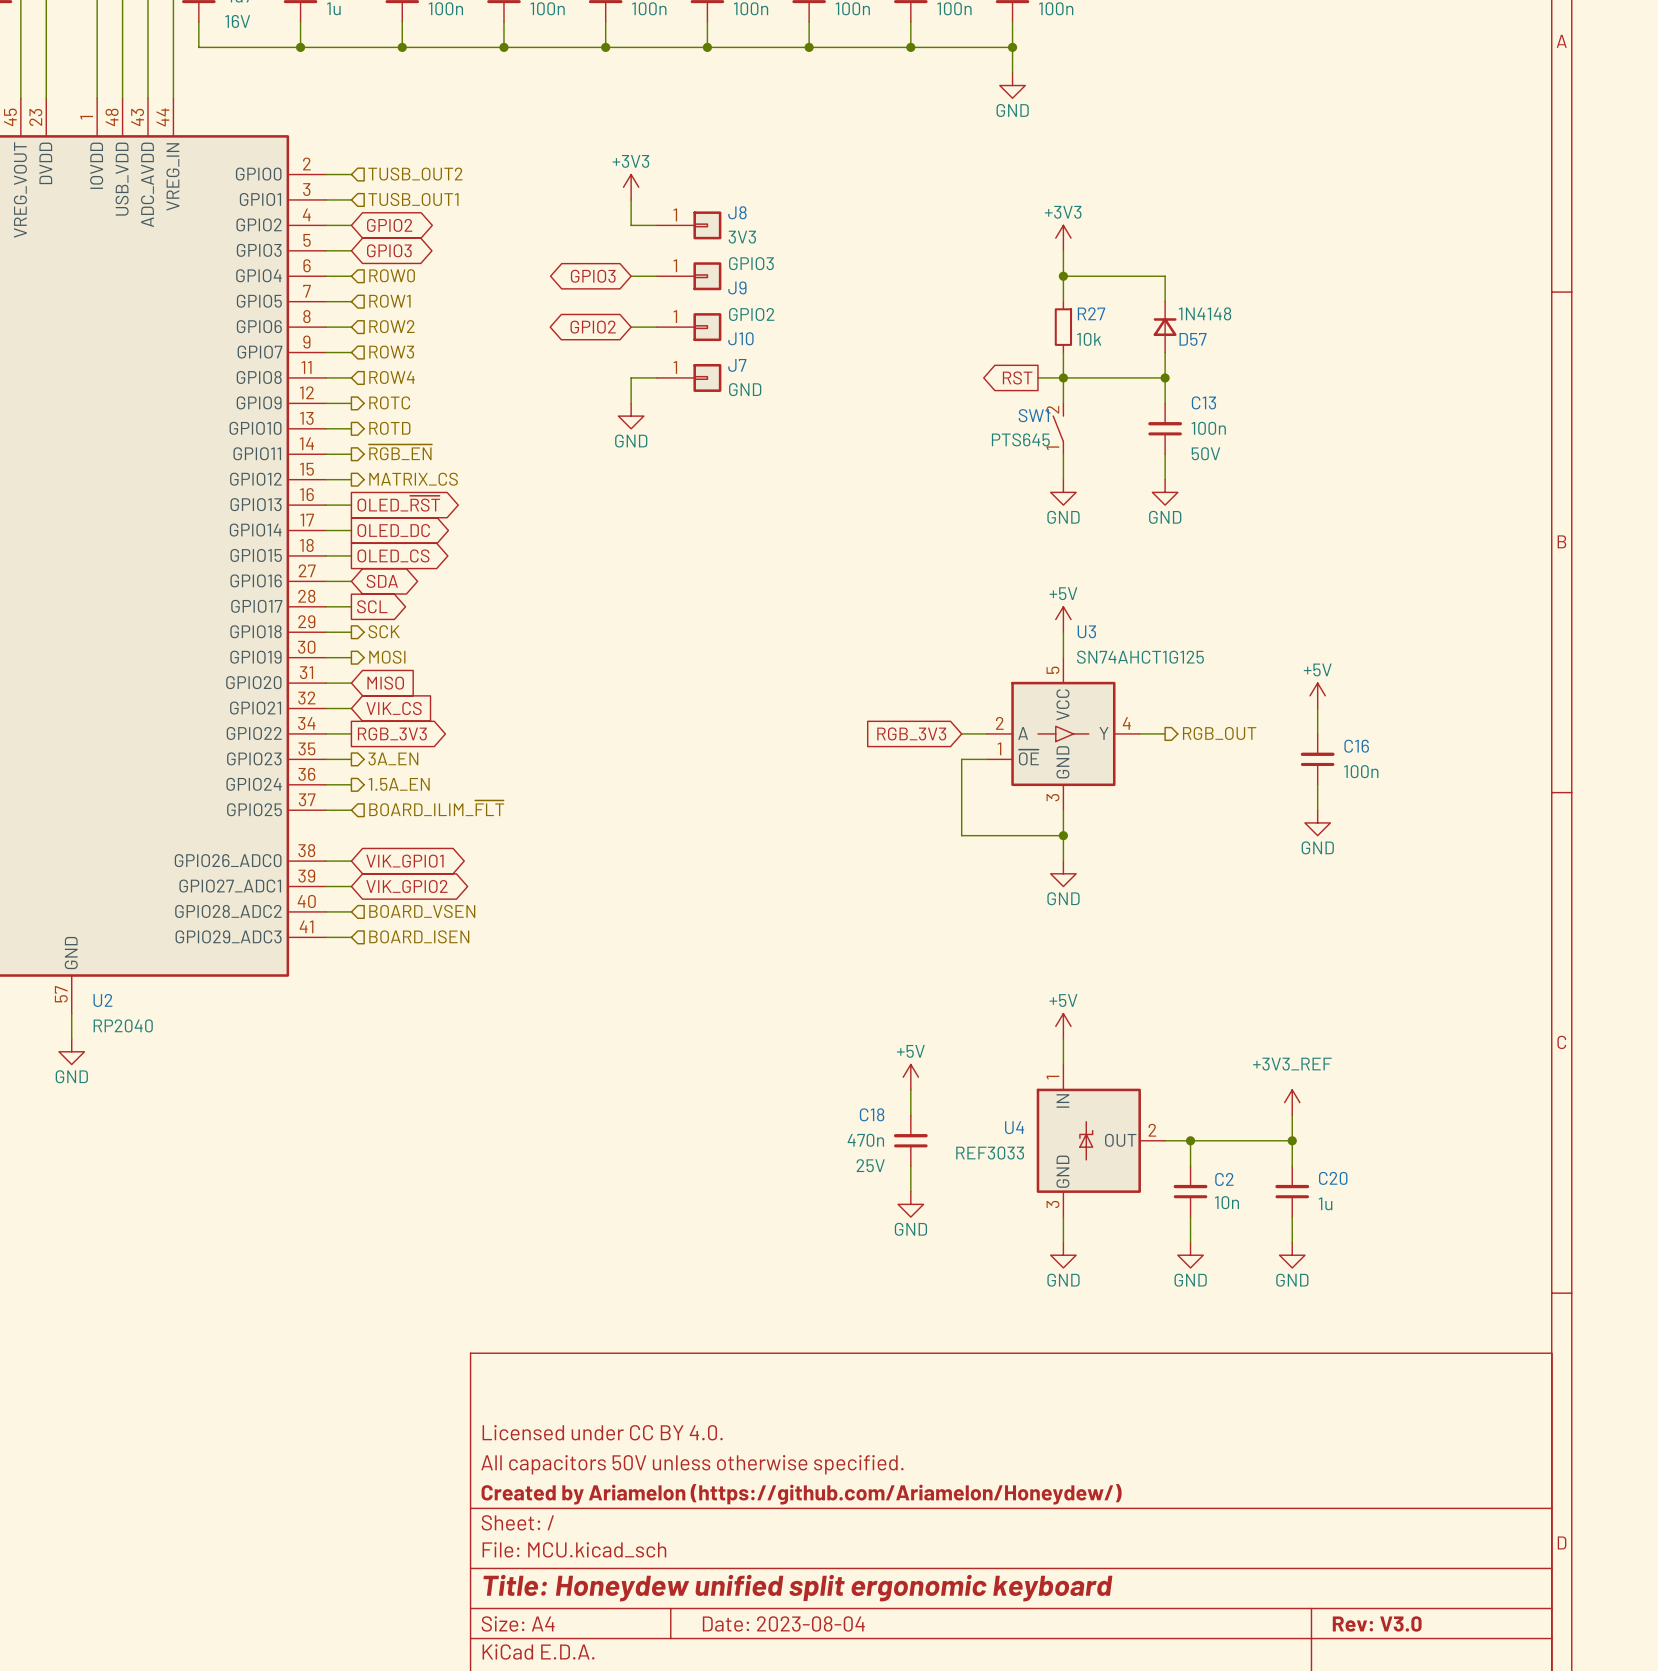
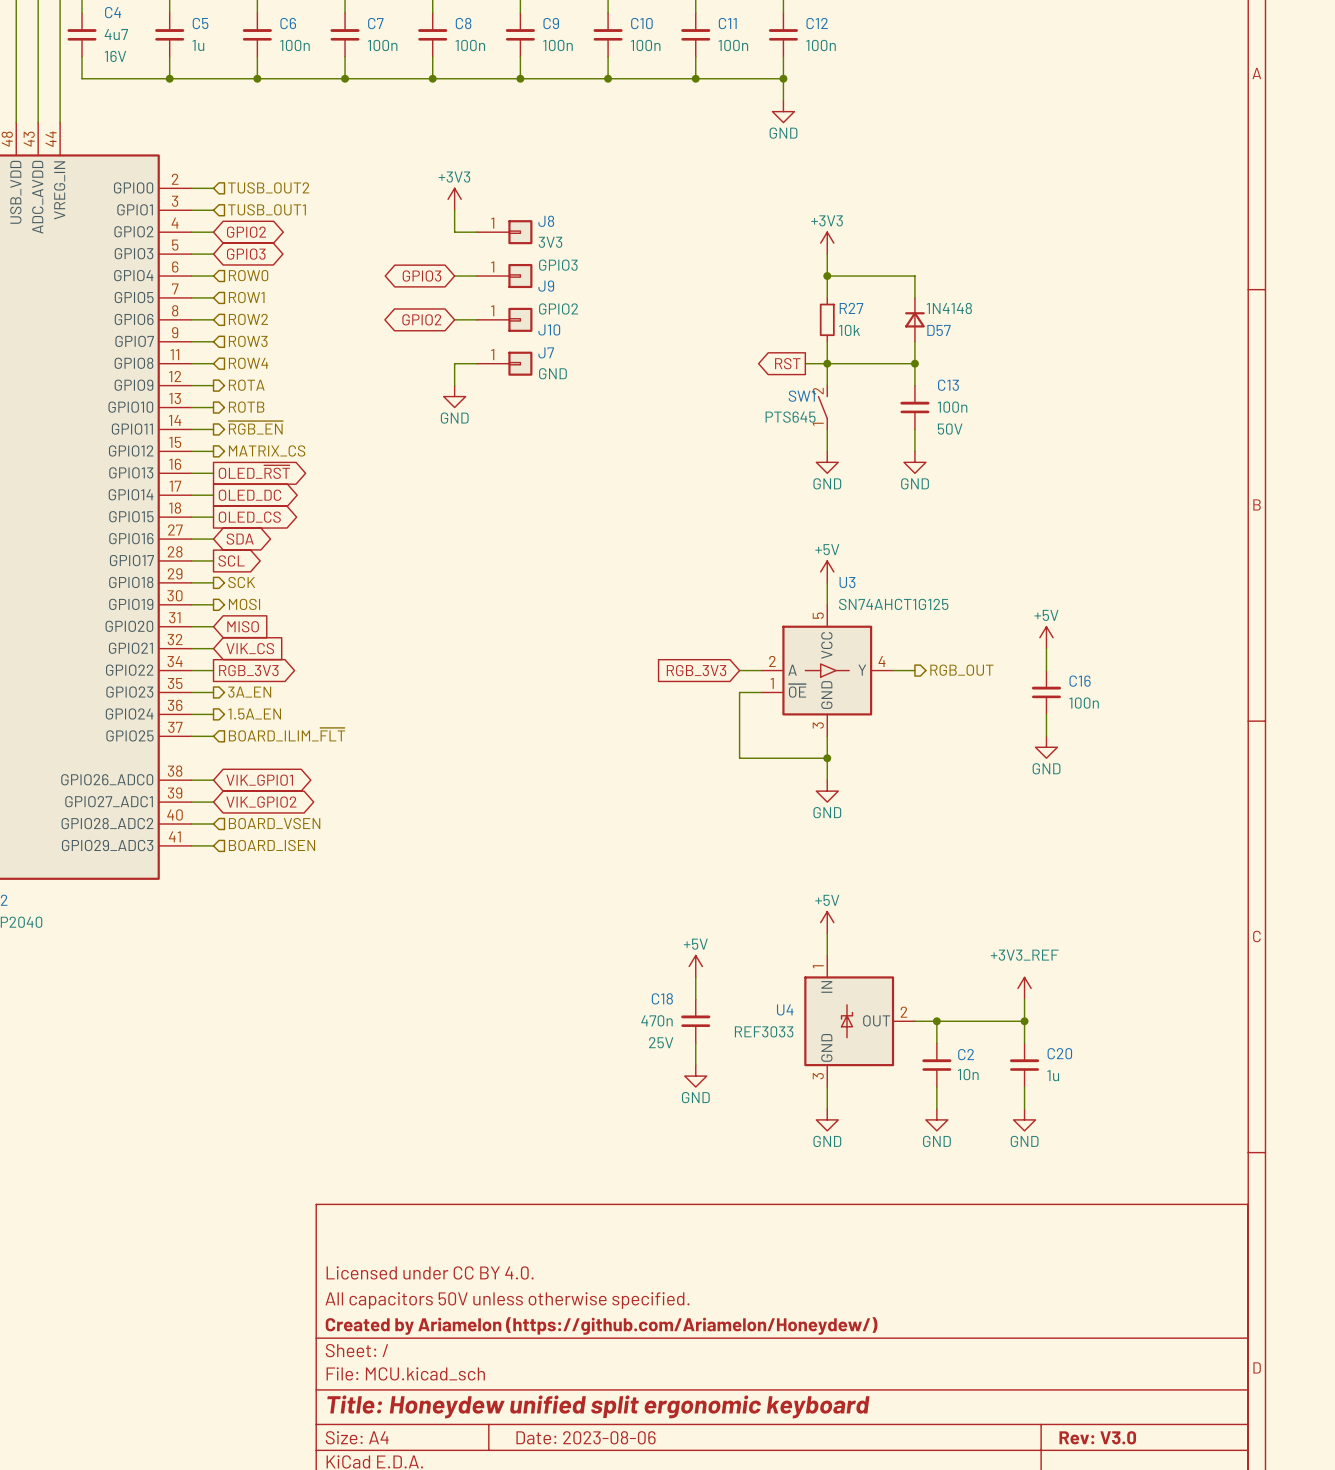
hierarchical label: ROTC (389, 402) -> ROTA (246, 385)
hierarchical label: ROTD (389, 428) -> ROTB (246, 407)
title block: Date: 2023-08-04 (783, 1623) -> Date: 2023-08-06 (586, 1437)

